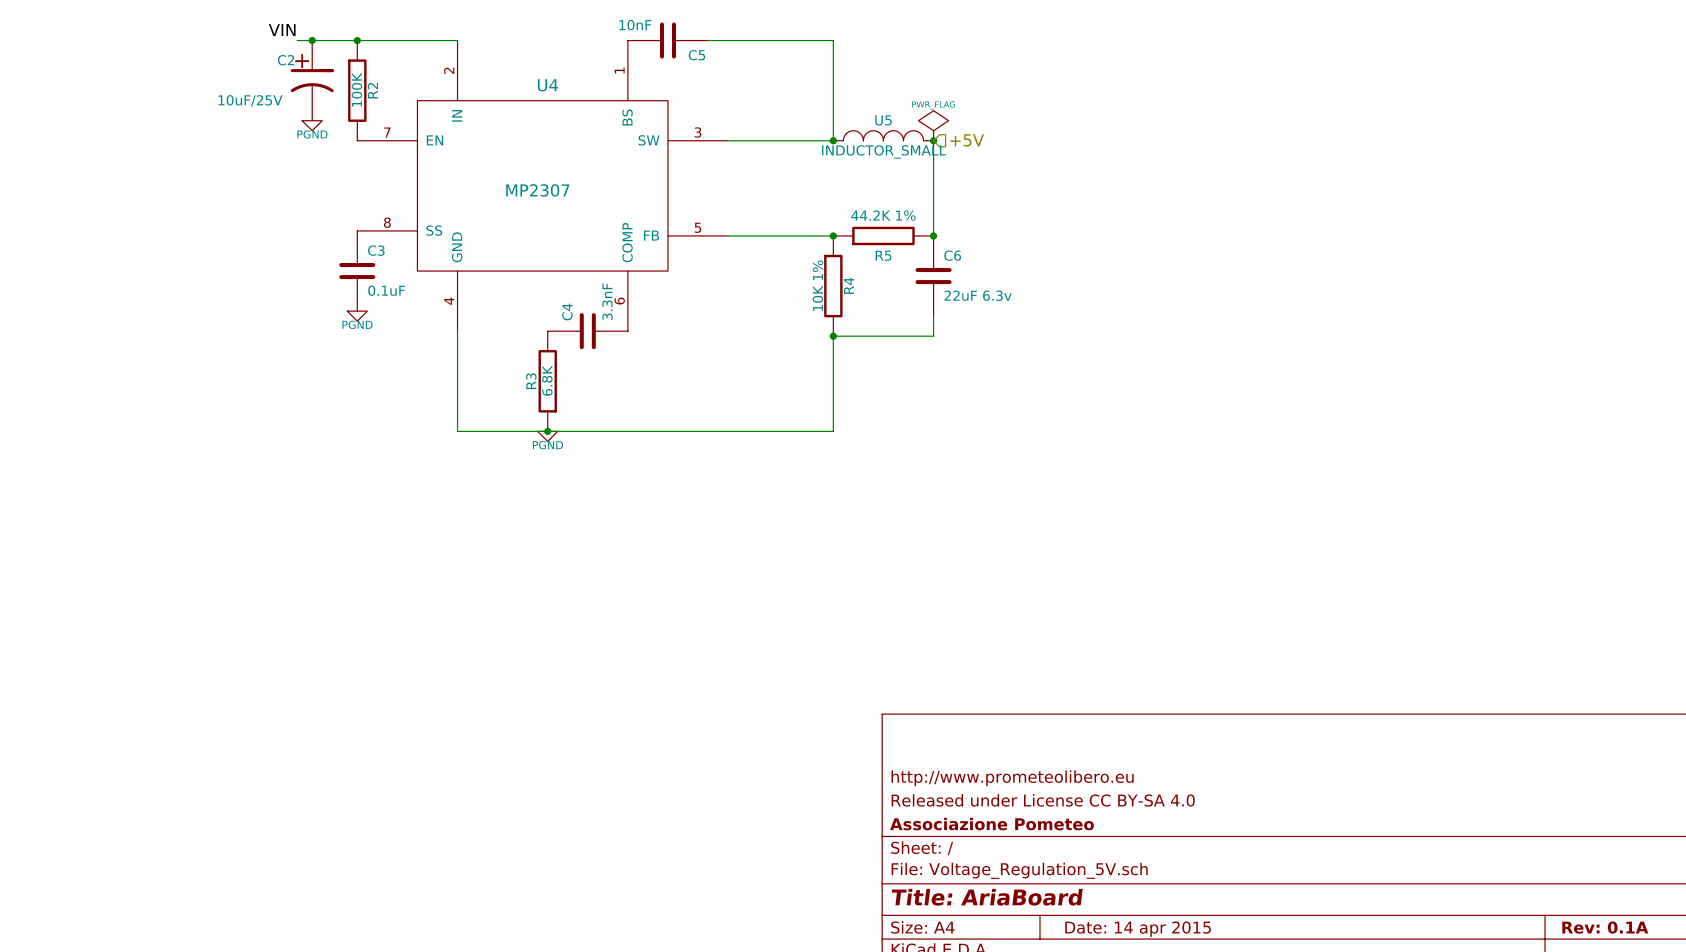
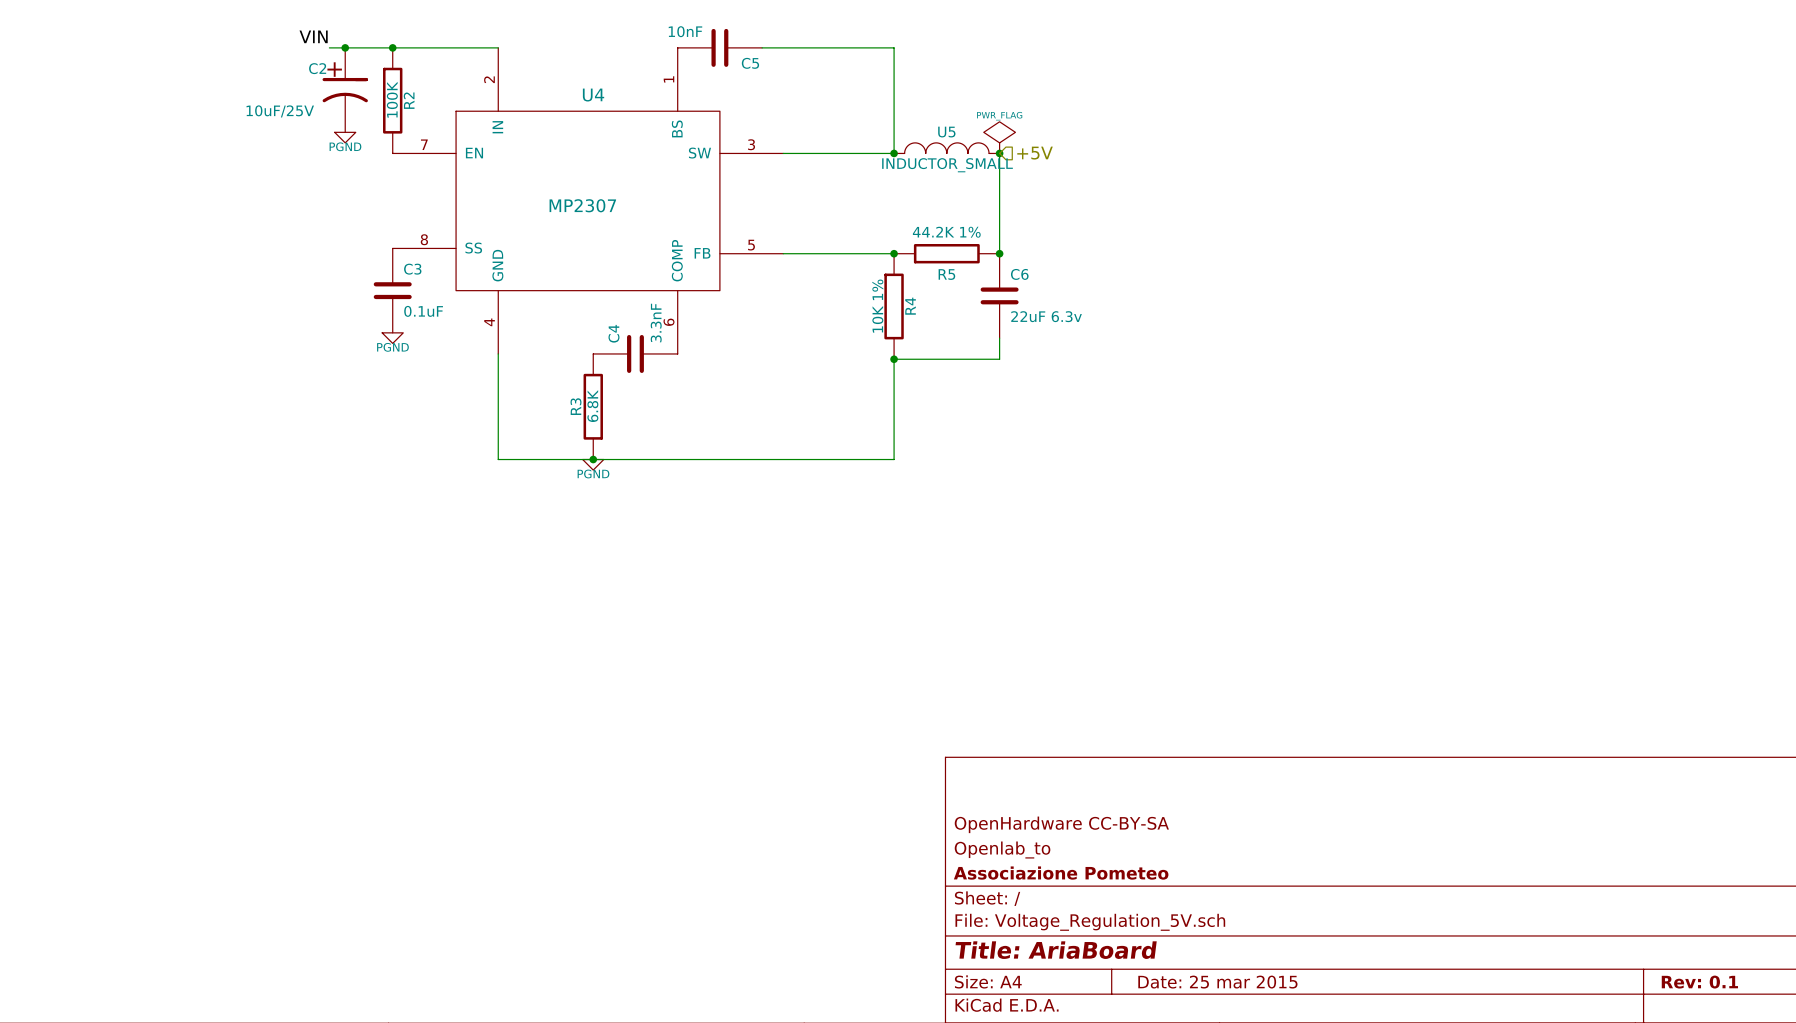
title block: http://www.prometeolibero.eu (1012, 778) -> OpenHardware CC-BY-SA (1061, 824)
title block: Released under License CC BY-SA 4.0 (1043, 800) -> Openlab_to (1002, 850)
title block: Rev: 0.1A (1605, 927) -> Rev: 0.1 (1699, 982)
title block: Date: 14 apr 2015 (1138, 929) -> Date: 25 mar 2015 (1217, 982)

